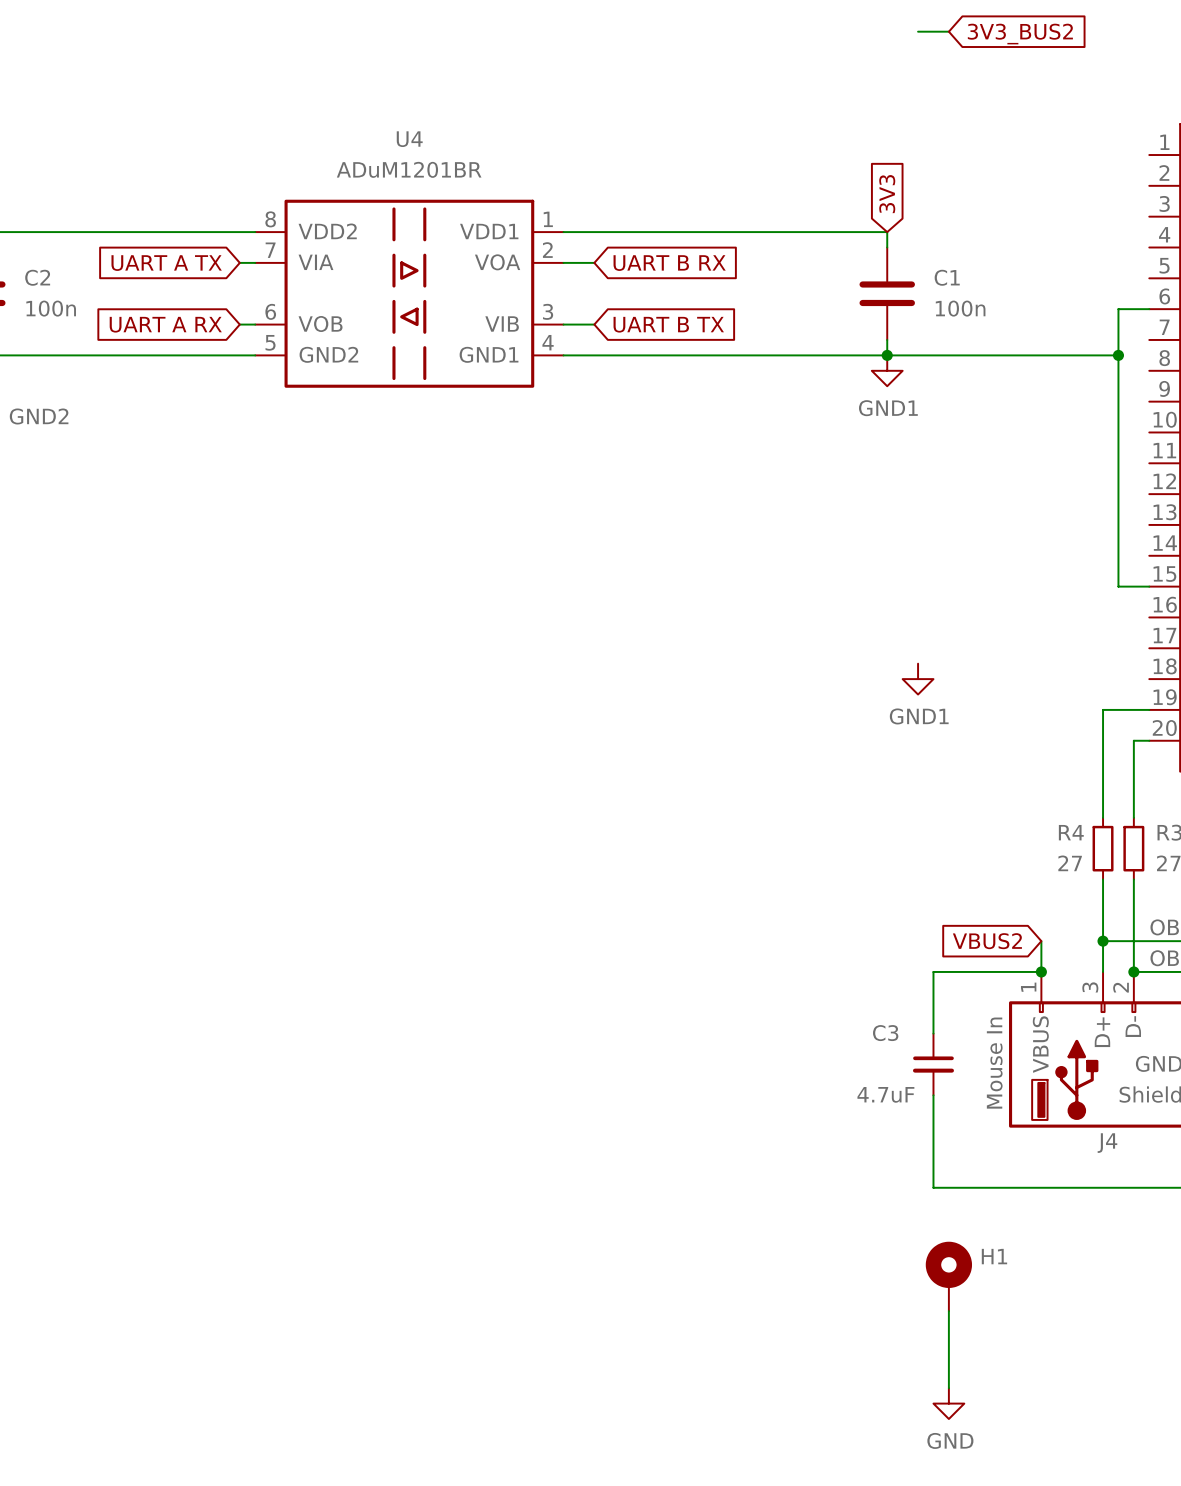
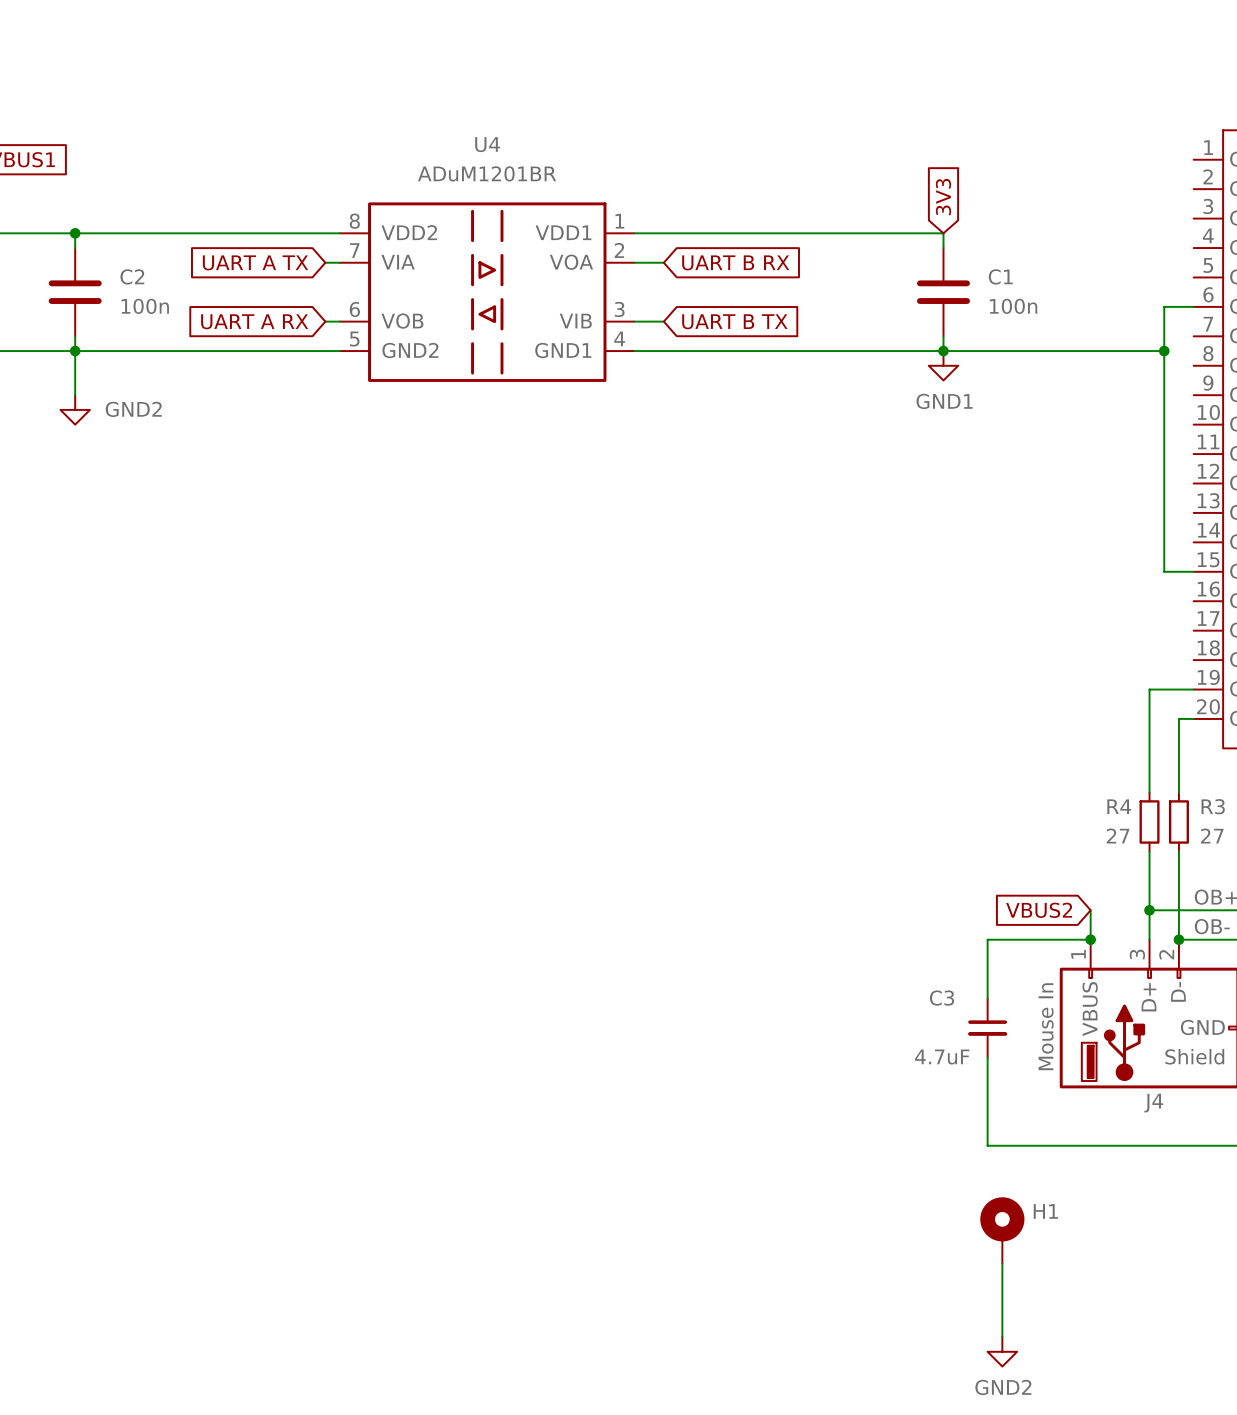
wire: (918, 31) (948, 31) -> none
global label: 3V3_BUS2 (1020, 34) -> none
power symbol: GND1 (918, 679) -> none
power symbol: GND (948, 1403) -> GND2 (1002, 1351)

